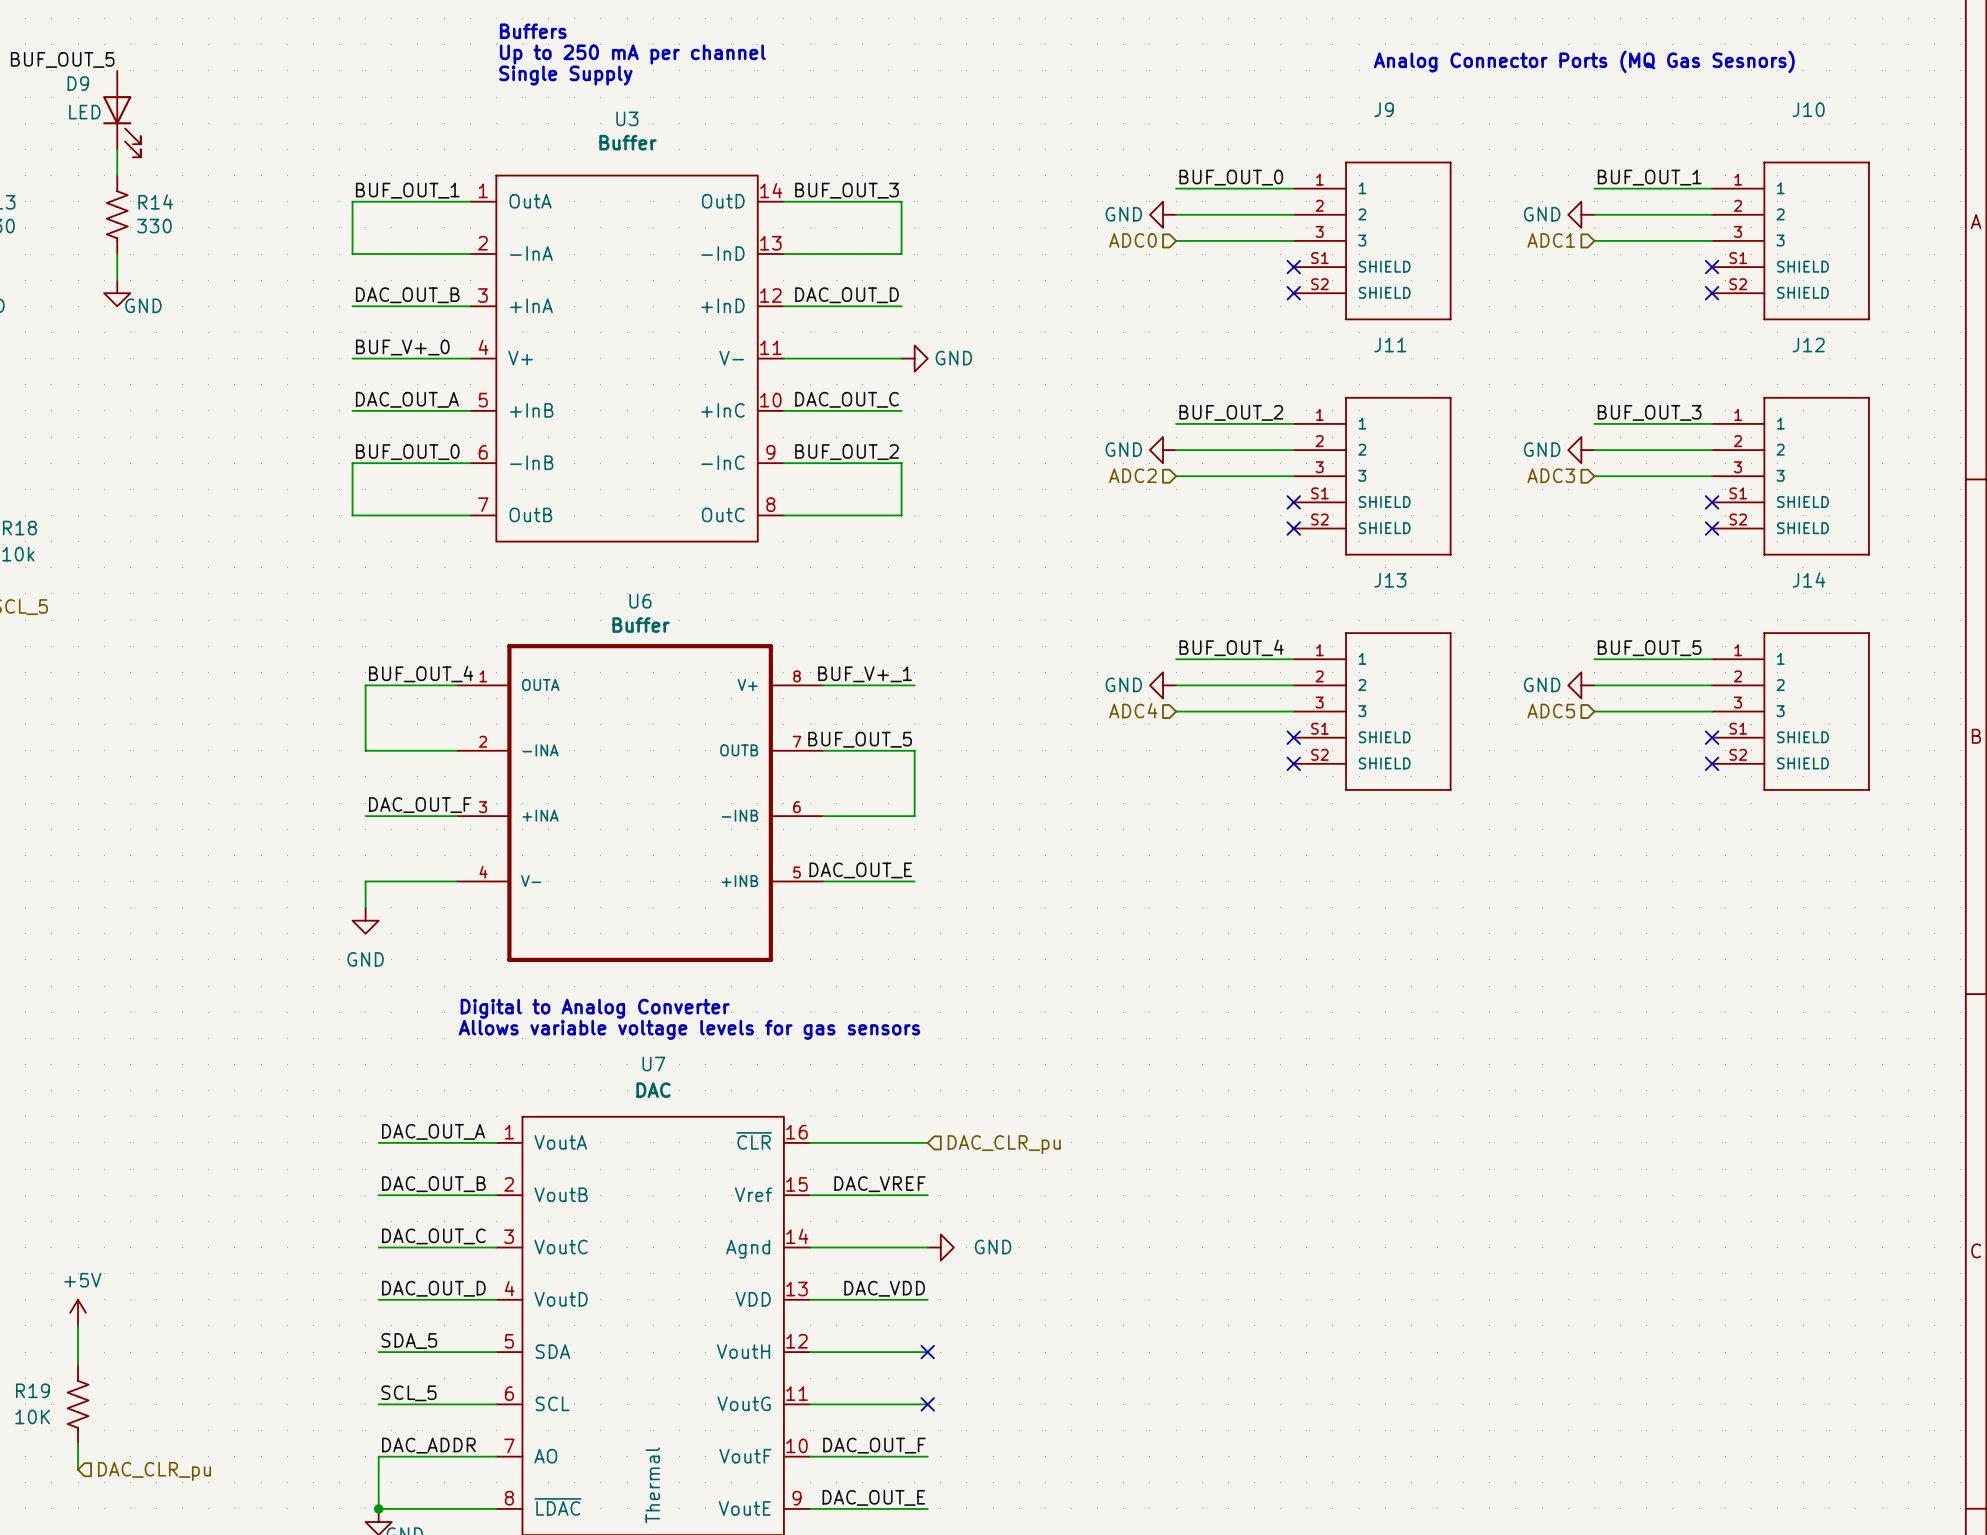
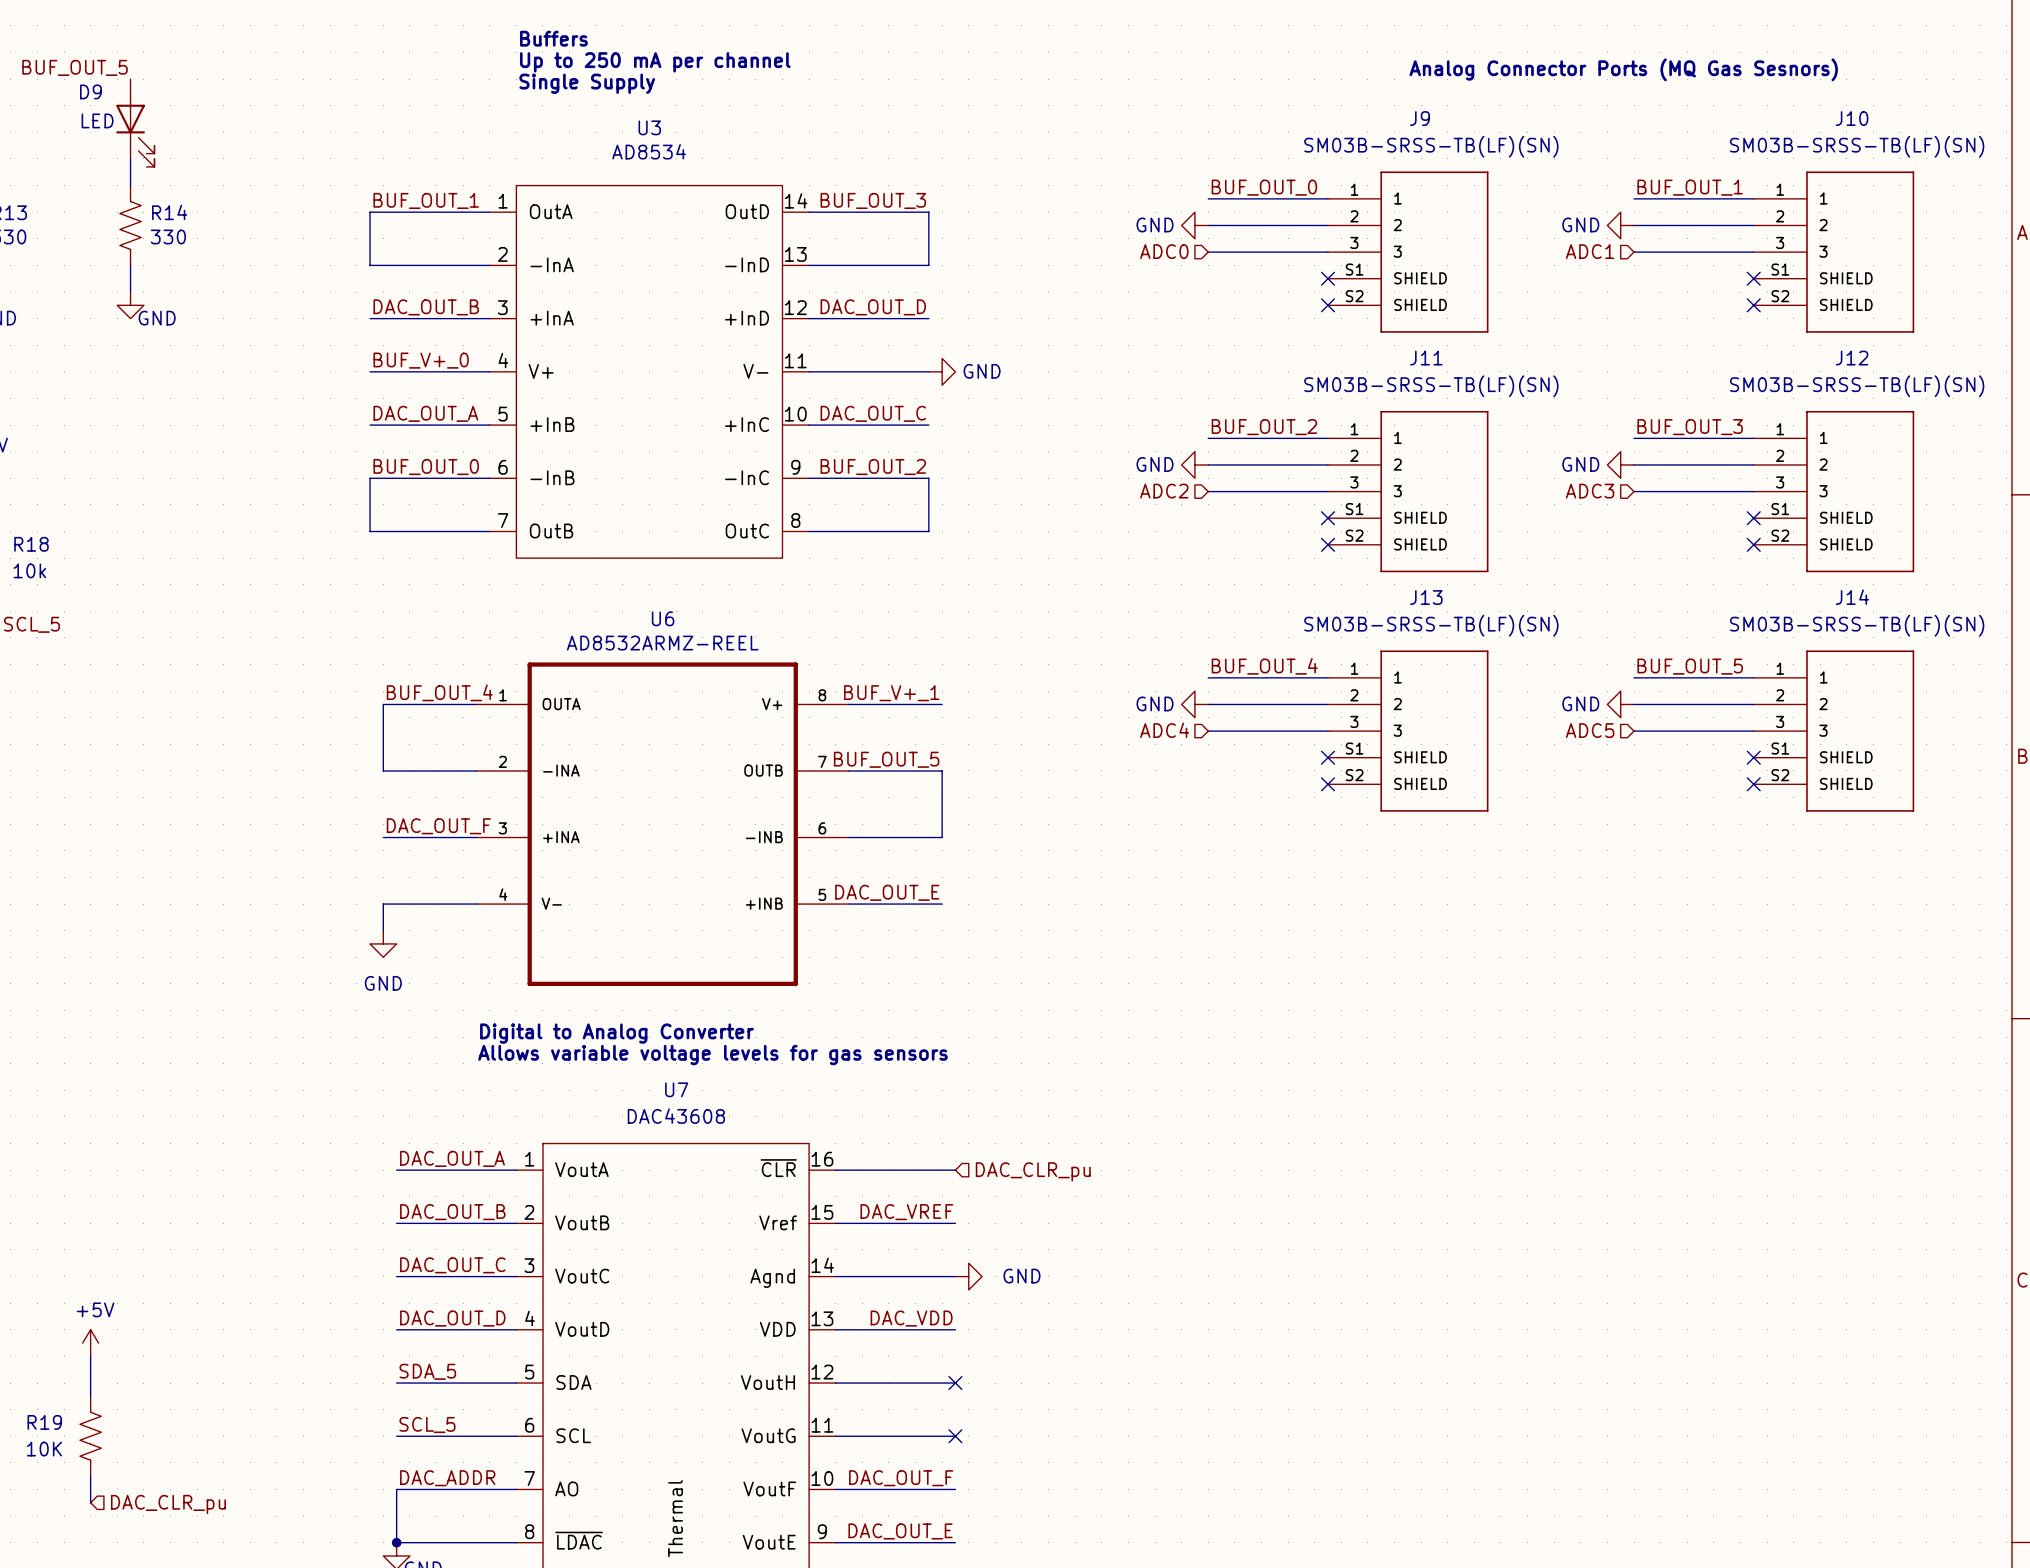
J9 value: none -> SM03B-SRSS-TB(LF)(SN) (1431, 146)
J10 value: none -> SM03B-SRSS-TB(LF)(SN) (1857, 146)
U3 value: Buffer (628, 142) -> AD8534 (649, 151)
J11 value: none -> SM03B-SRSS-TB(LF)(SN) (1431, 386)
J12 value: none -> SM03B-SRSS-TB(LF)(SN) (1857, 386)
J13 value: none -> SM03B-SRSS-TB(LF)(SN) (1431, 625)
J14 value: none -> SM03B-SRSS-TB(LF)(SN) (1857, 625)
U6 value: Buffer (641, 625) -> AD8532ARMZ-REEL (662, 643)
U7 value: DAC (653, 1090) -> DAC43608 (676, 1116)

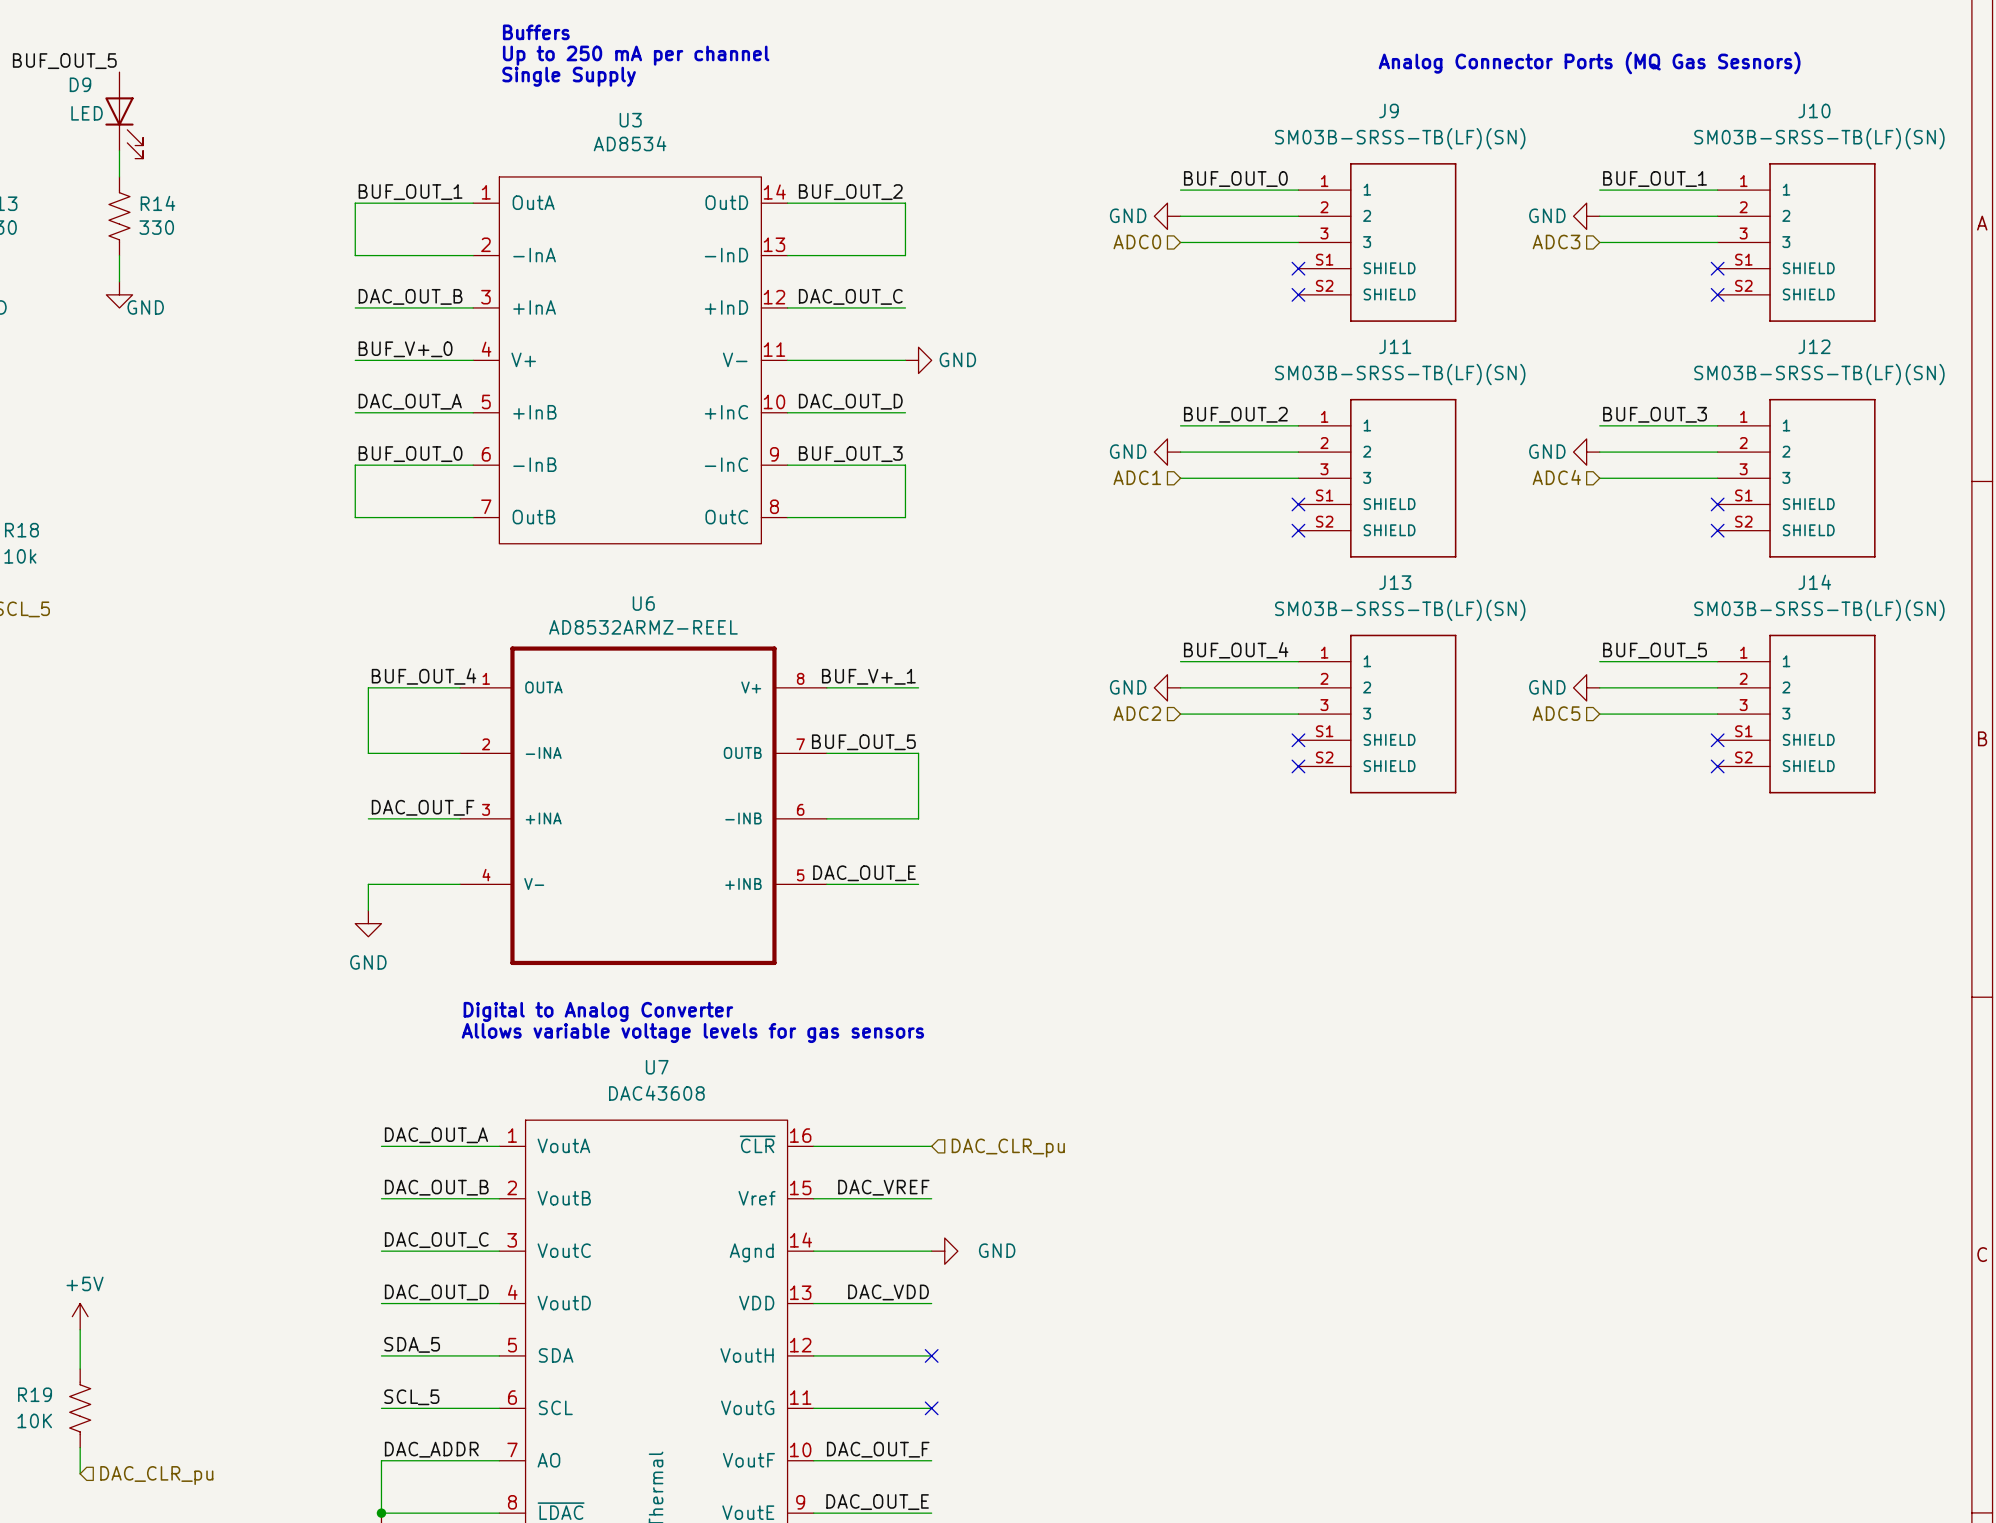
label: BUF_OUT_3 (873, 200) -> BUF_OUT_2 (850, 192)
hierarchical label: ADC1 (1590, 251) -> ADC3 (1556, 241)
label: DAC_OUT_D (873, 307) -> DAC_OUT_C (850, 296)
label: DAC_OUT_C (873, 413) -> DAC_OUT_D (850, 401)
label: BUF_OUT_2 (873, 467) -> BUF_OUT_3 (850, 454)
hierarchical label: ADC2 (1164, 491) -> ADC1 (1137, 477)
hierarchical label: ADC3 (1590, 491) -> ADC4 (1556, 477)
hierarchical label: ADC4 (1164, 730) -> ADC2 (1137, 713)

